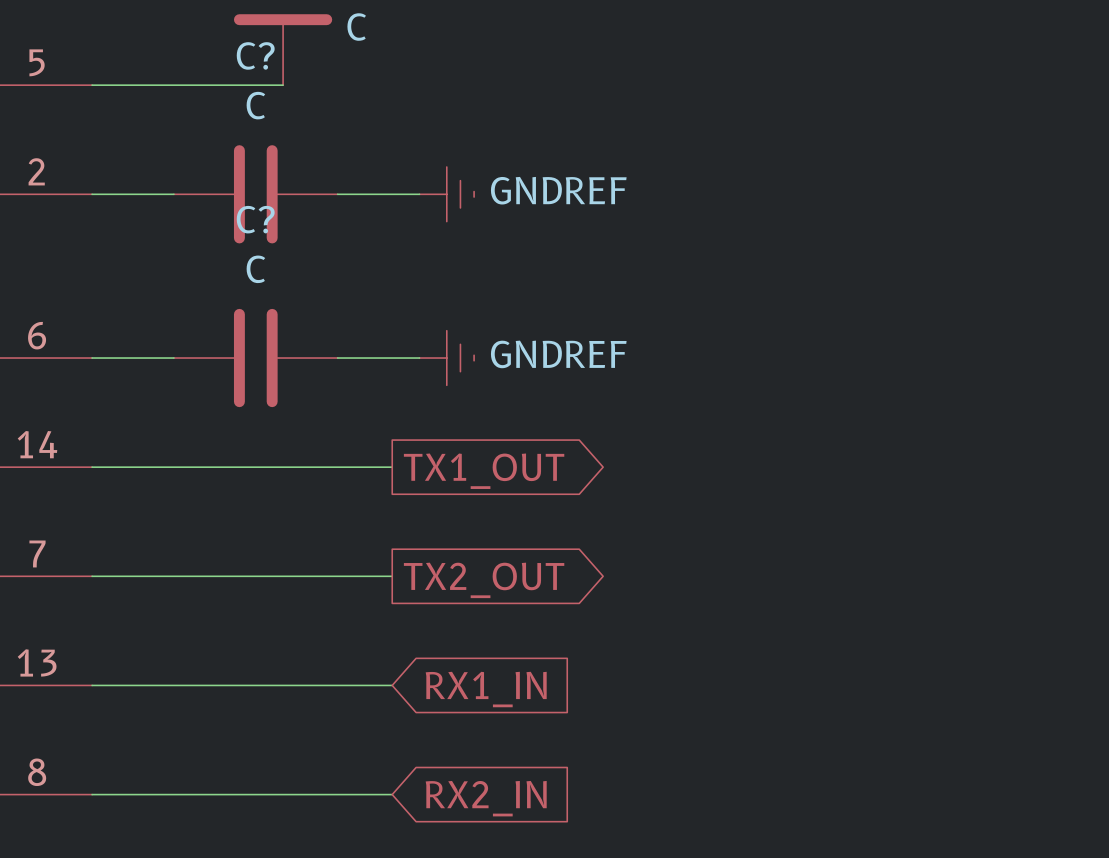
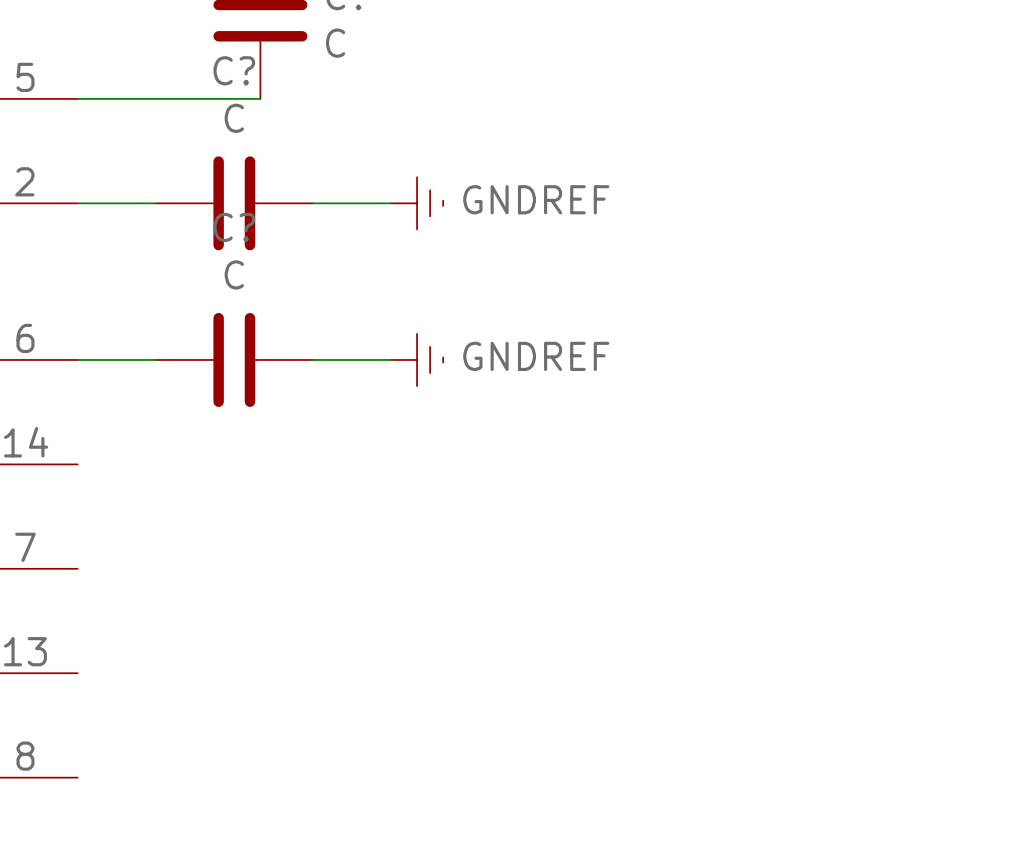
wire: (92, 467) (392, 467) -> none
global label: TX1_OUT (484, 471) -> none
wire: (92, 576) (392, 576) -> none
global label: TX2_OUT (484, 580) -> none
wire: (92, 685) (392, 685) -> none
global label: RX1_IN (486, 689) -> none
wire: (92, 794) (392, 794) -> none
global label: RX2_IN (486, 798) -> none

